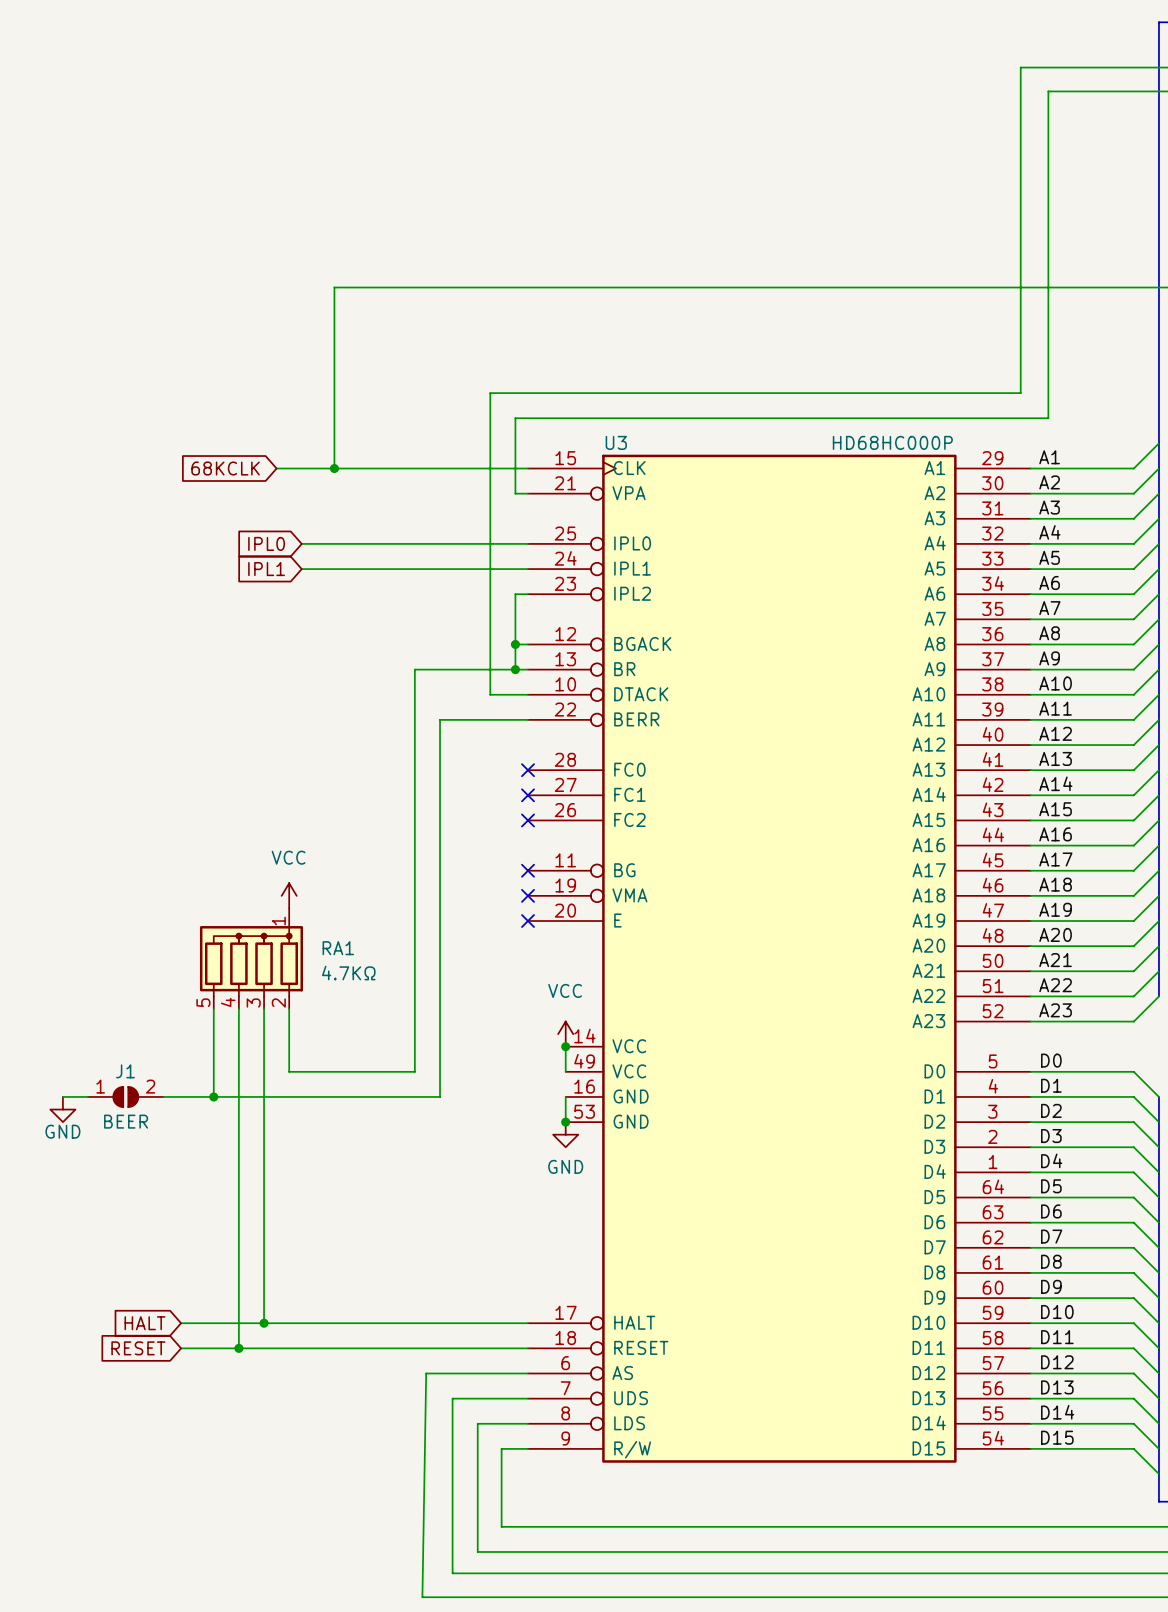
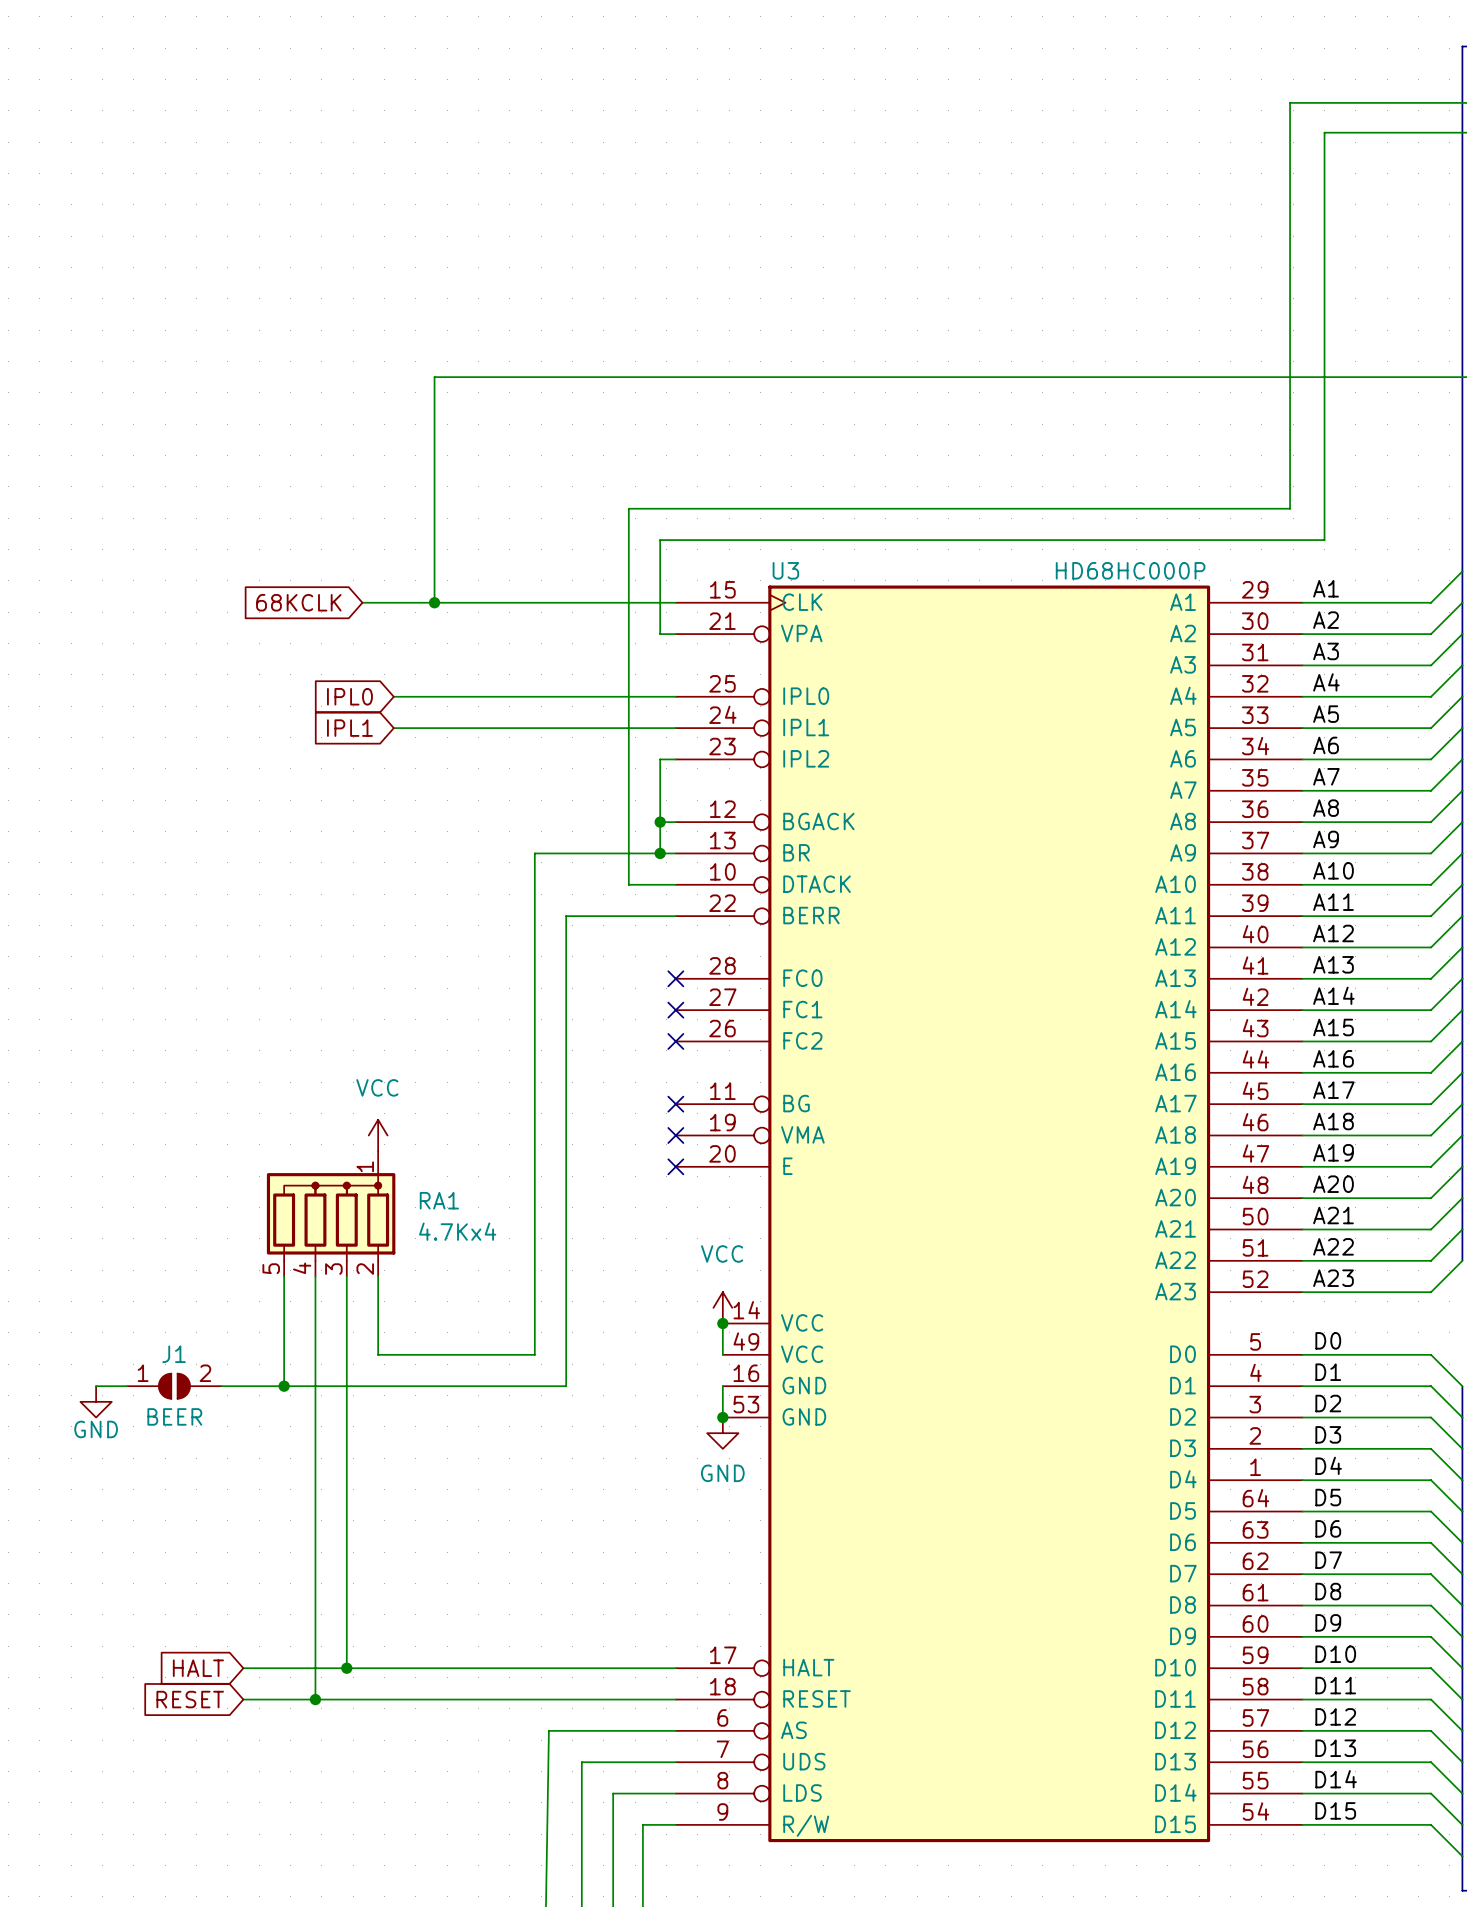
RA1 value: 4.7KΩ (348, 973) -> 4.7Kx4 (457, 1231)

